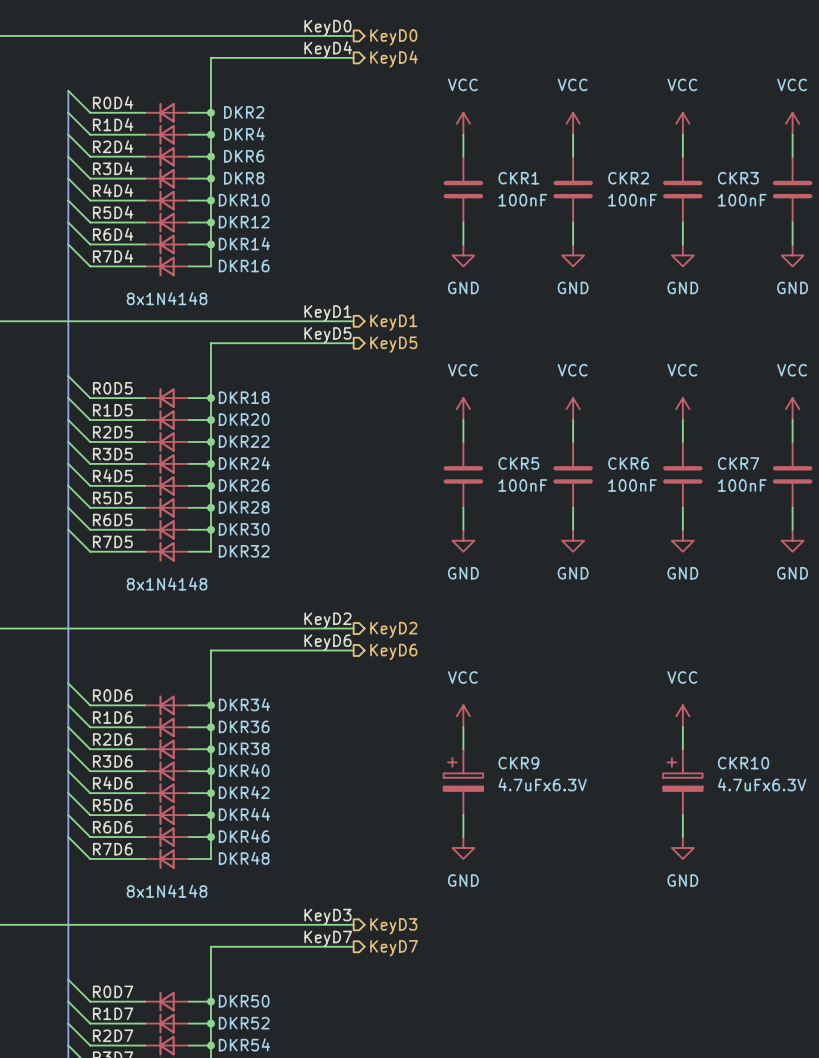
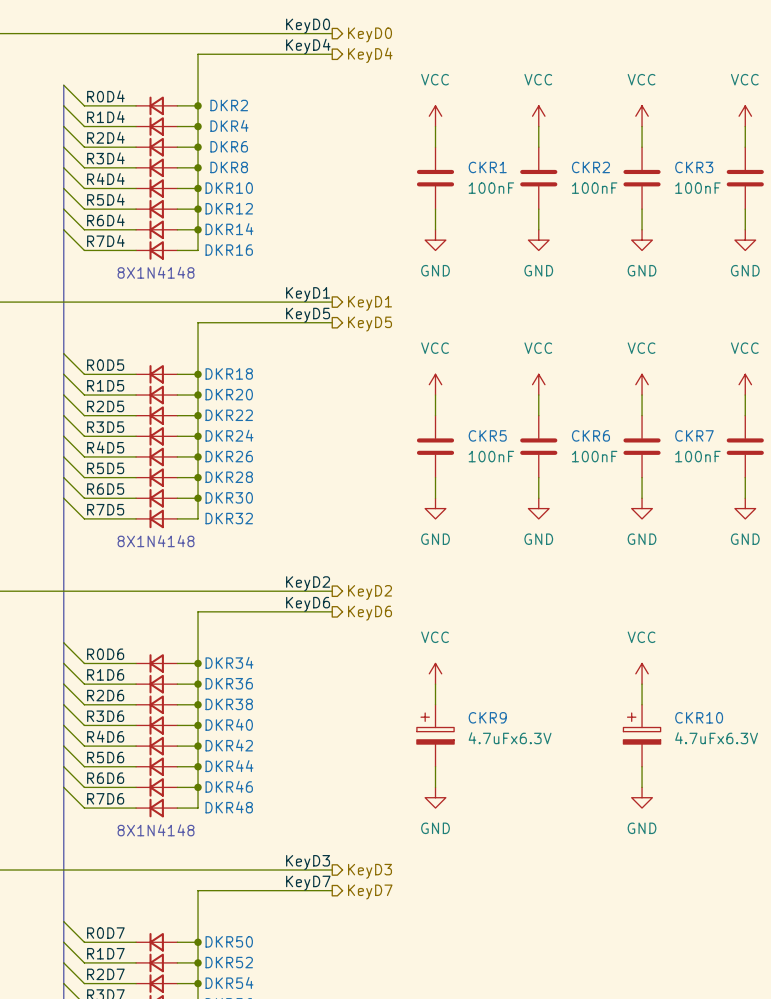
text: none -> 8X1N4148 (156, 272)
DKR16 value: 8x1N4148 (167, 298) -> none
text: none -> 8X1N4148 (156, 541)
DKR32 value: 8x1N4148 (167, 583) -> none
text: none -> 8X1N4148 (156, 830)
DKR48 value: 8x1N4148 (167, 891) -> none

